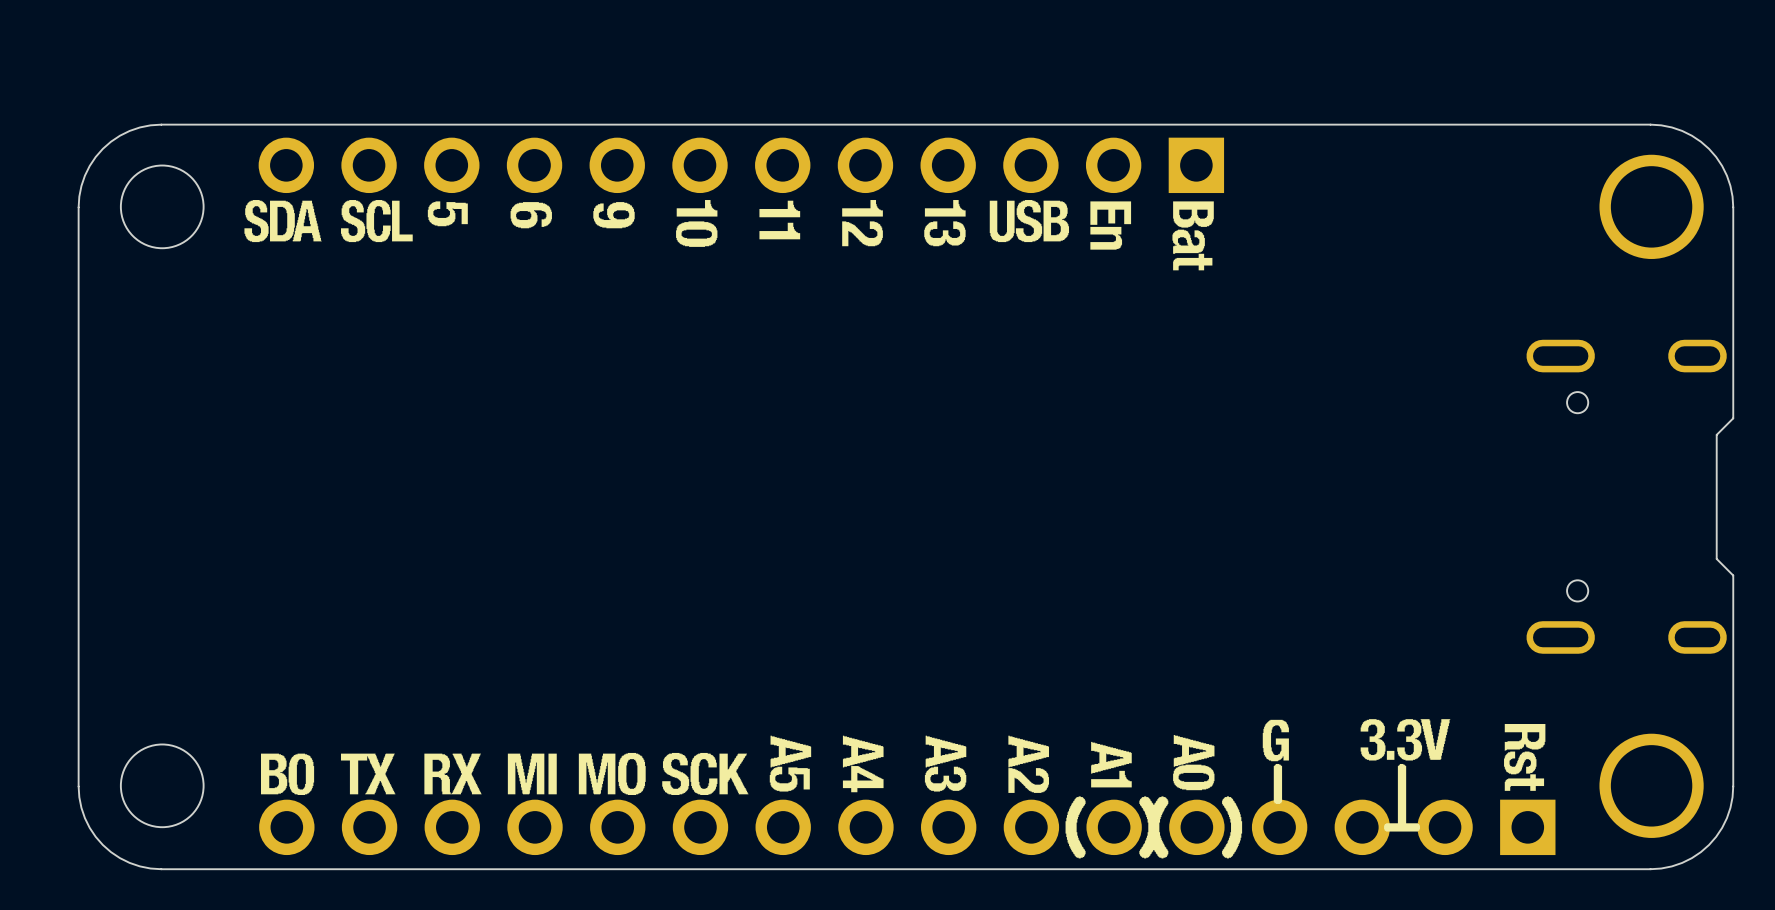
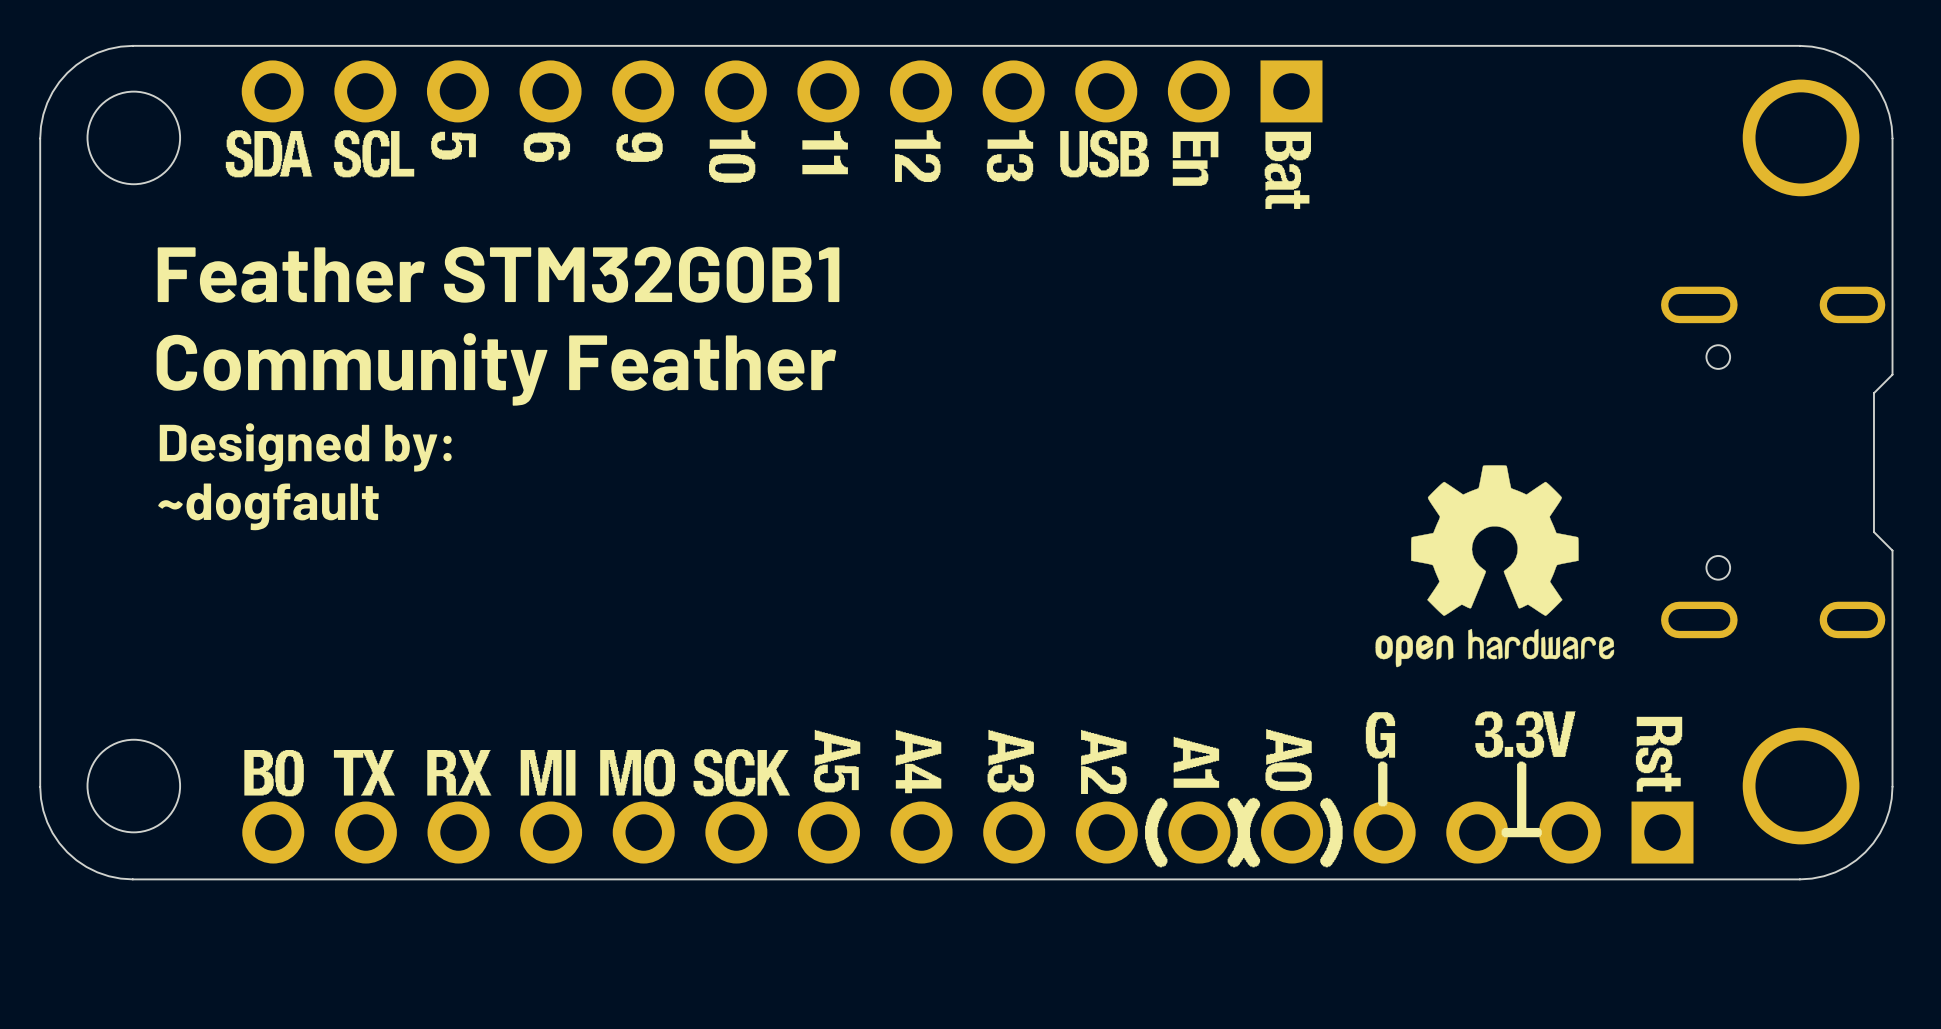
text: none -> Feather STM32G0B1 (498, 274)
text: none -> Community Feather (496, 369)
text: none -> Designed by: (305, 447)
drawing: none -> [1375, 465, 1615, 668]
text: none -> ~dogfault (268, 506)

